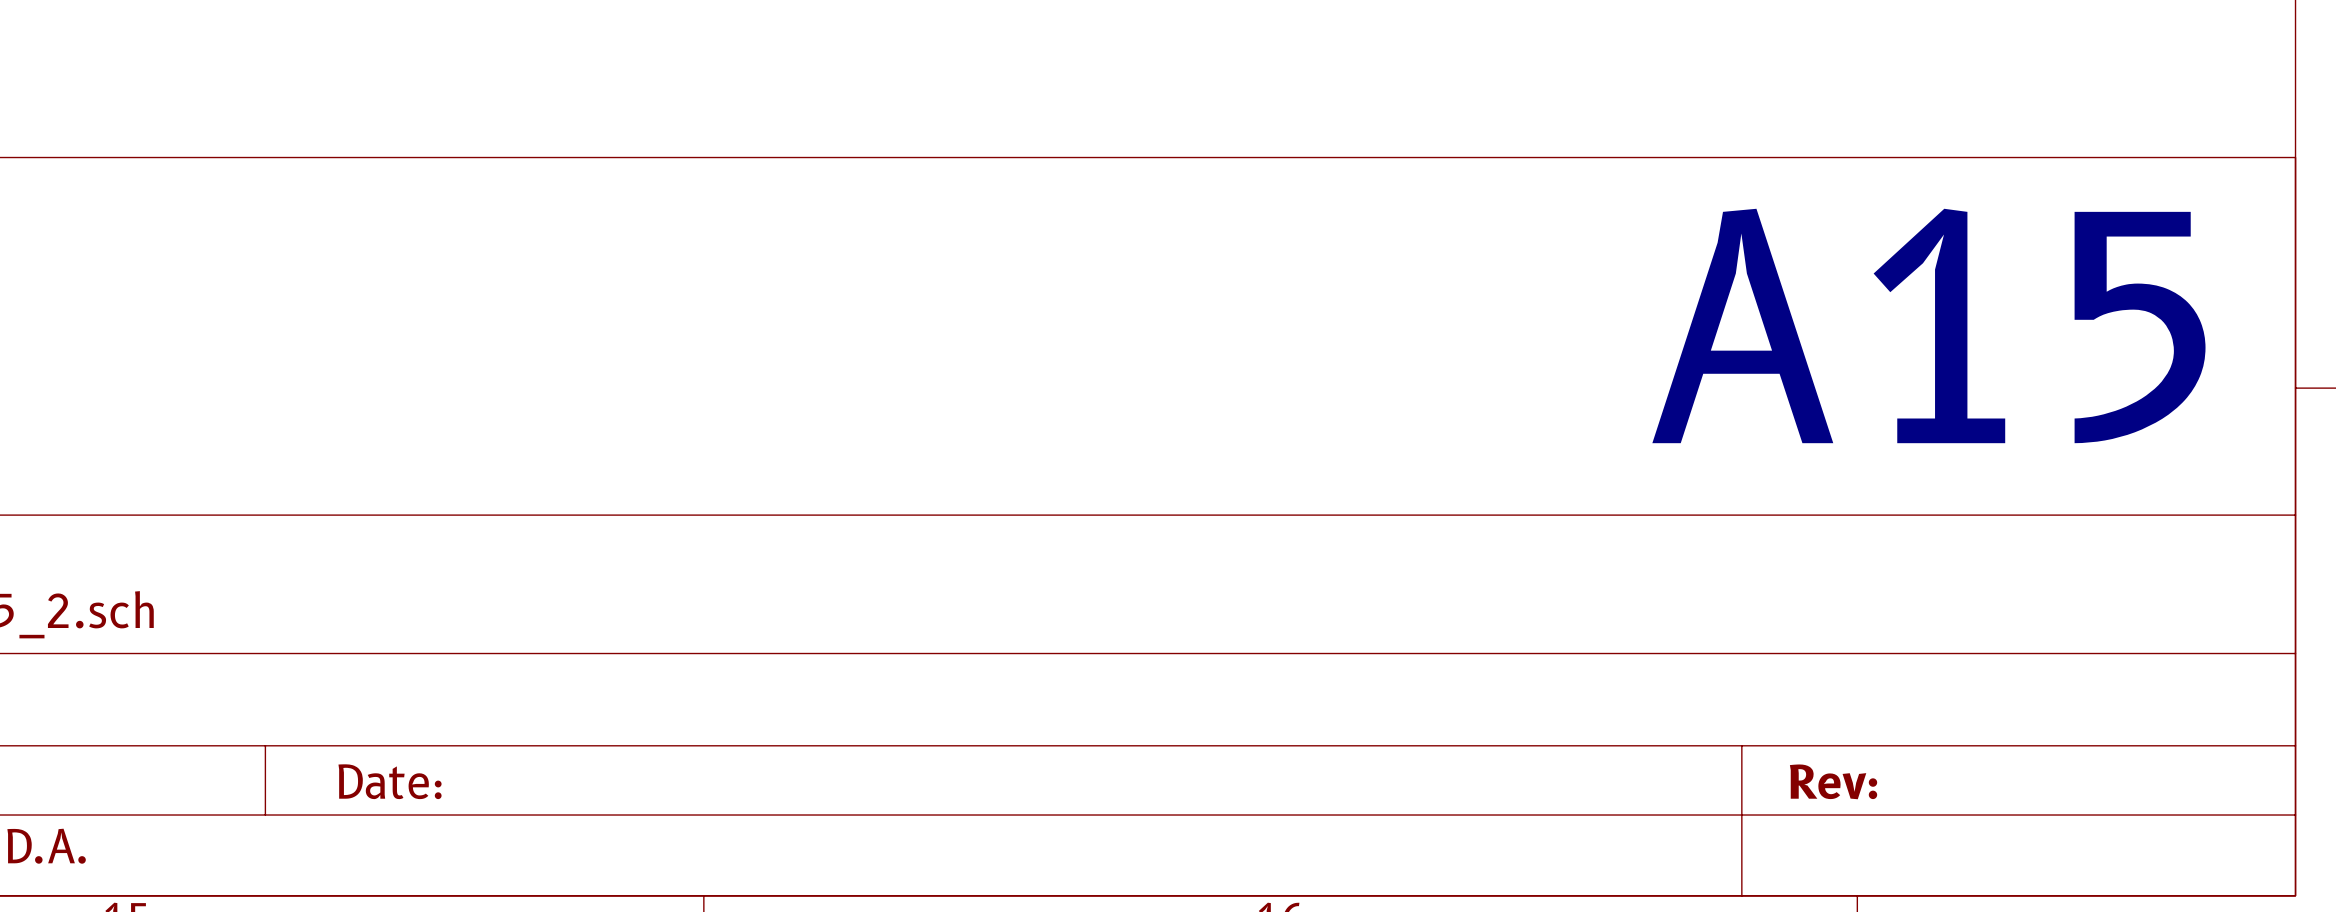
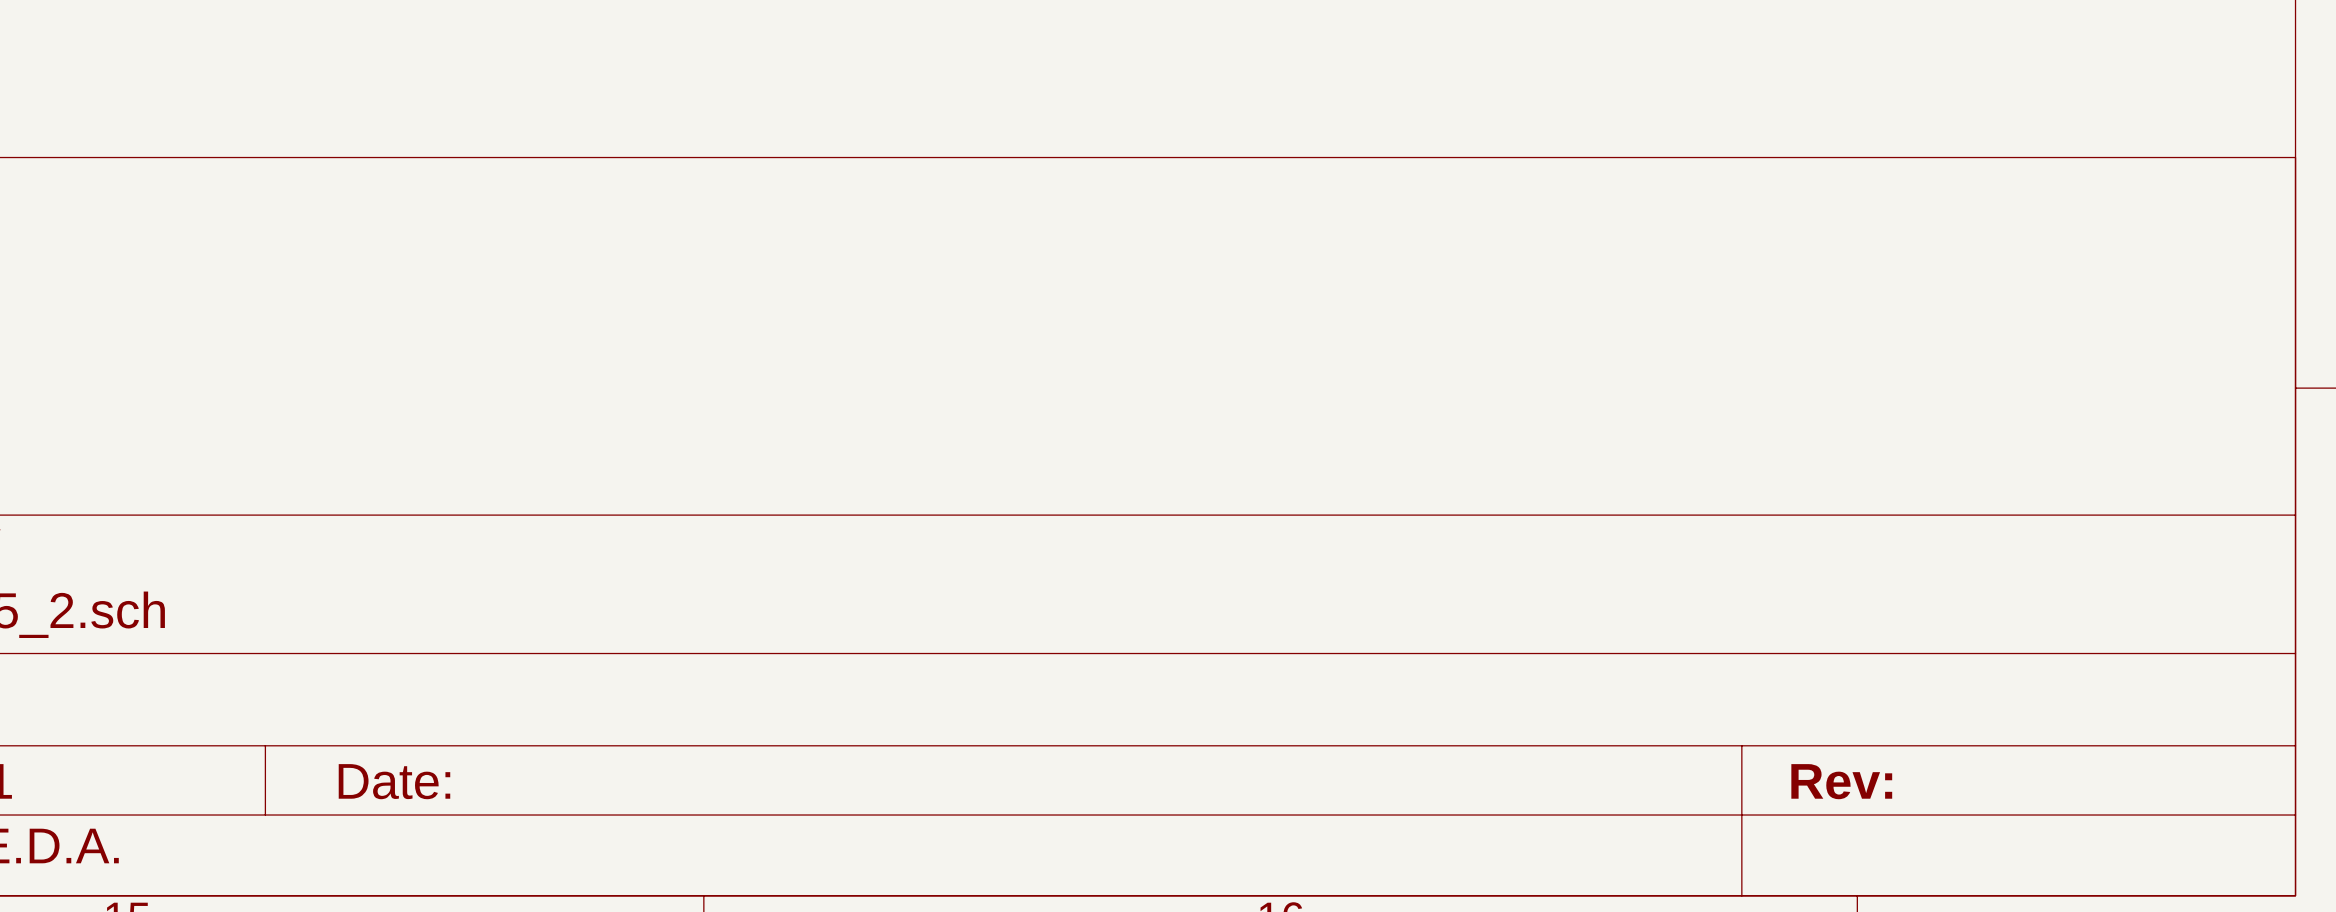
text: A15 (1928, 325) -> none

